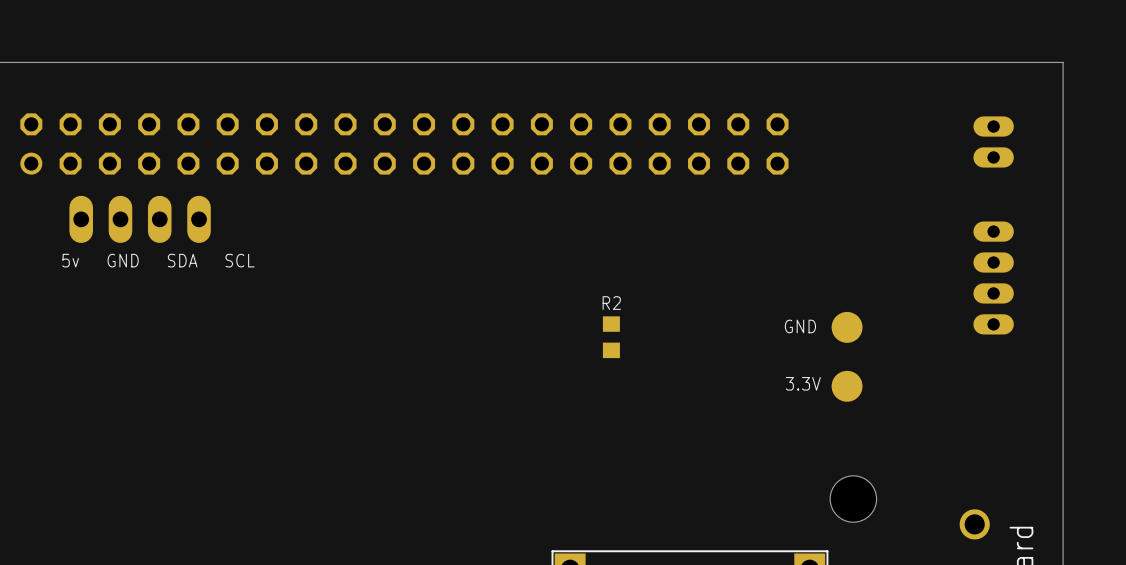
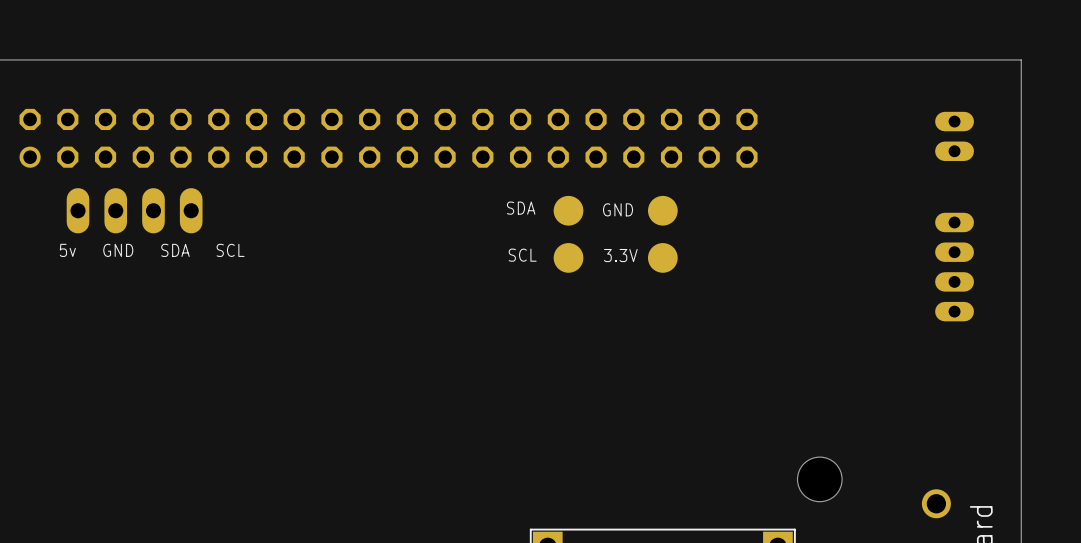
SDA: none -> (568, 210)
SCL: none -> (568, 257)
GND position: (847, 327) -> (662, 210)
R2: (611, 337) -> none
3.3V position: (847, 386) -> (662, 257)

